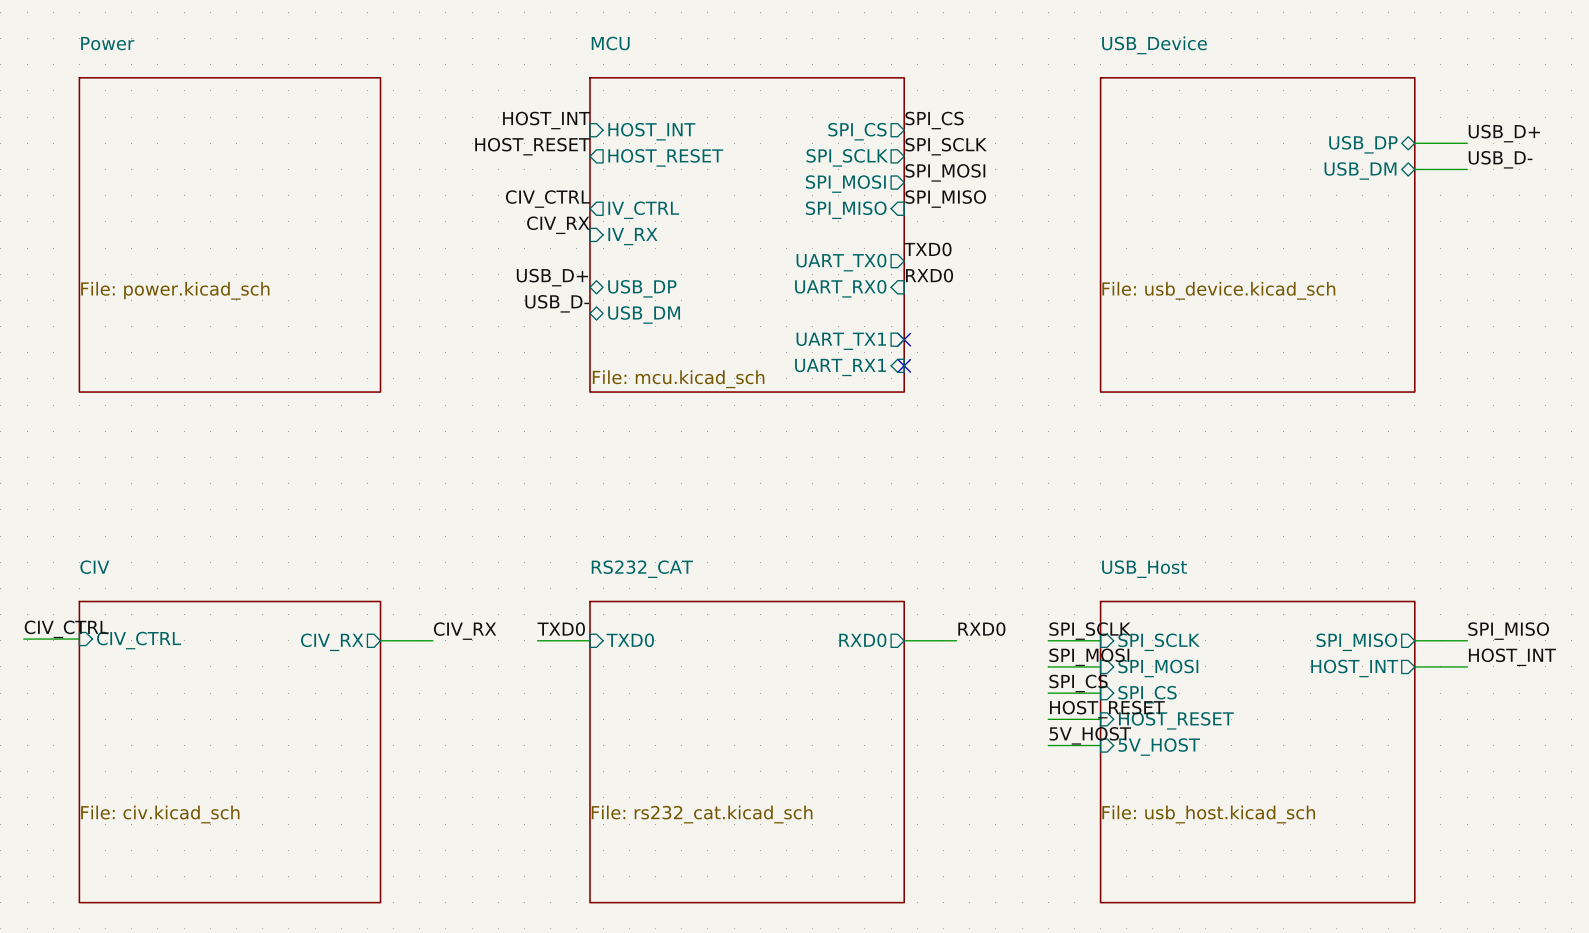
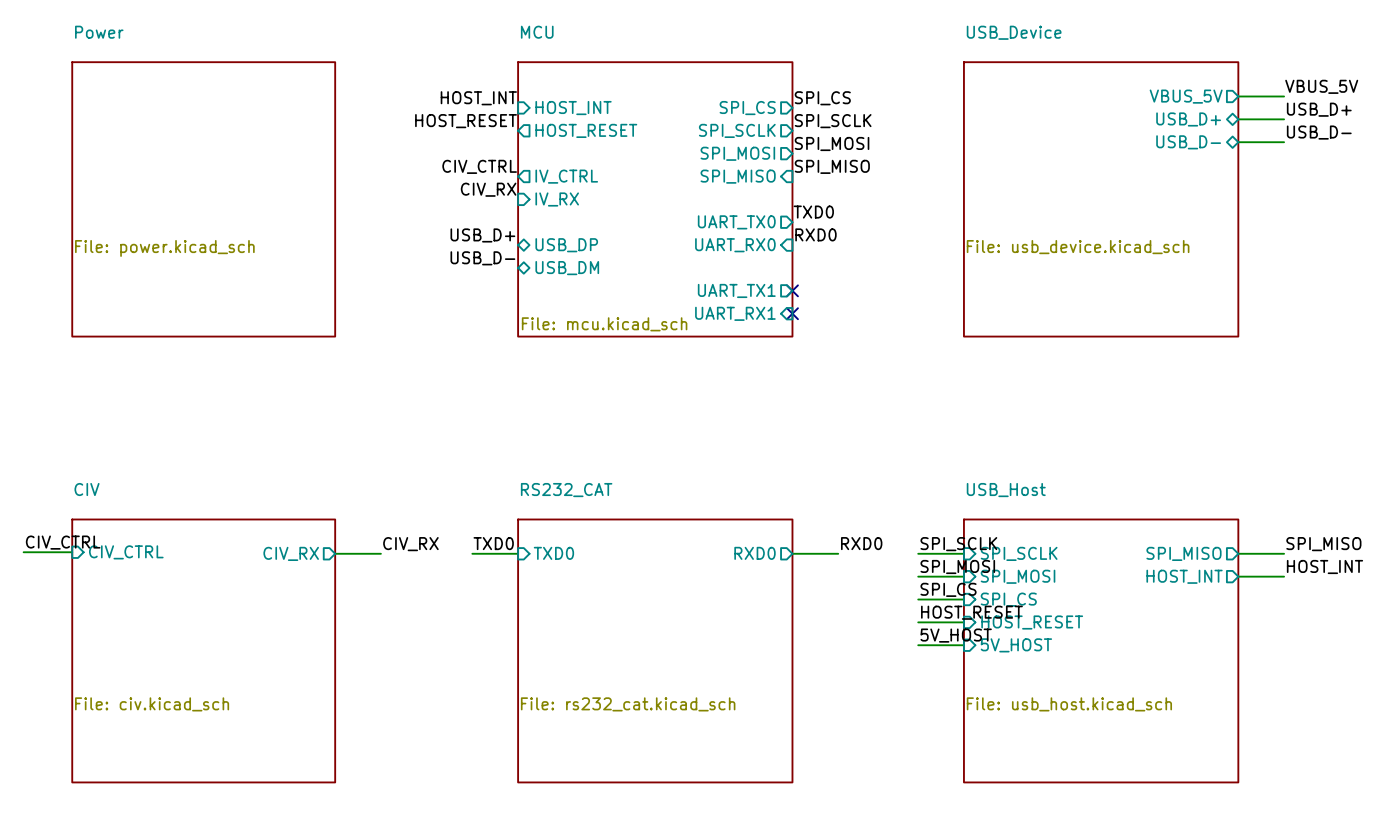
label: none -> VBUS_5V (1321, 86)
wire: none -> (1238, 96) (1284, 96)
sheet pin: none -> VBUS_5V (1186, 96)
sheet pin: USB_DP (1363, 144) -> USB_D+ (1188, 119)
sheet pin: USB_DM (1360, 170) -> USB_D- (1188, 142)

